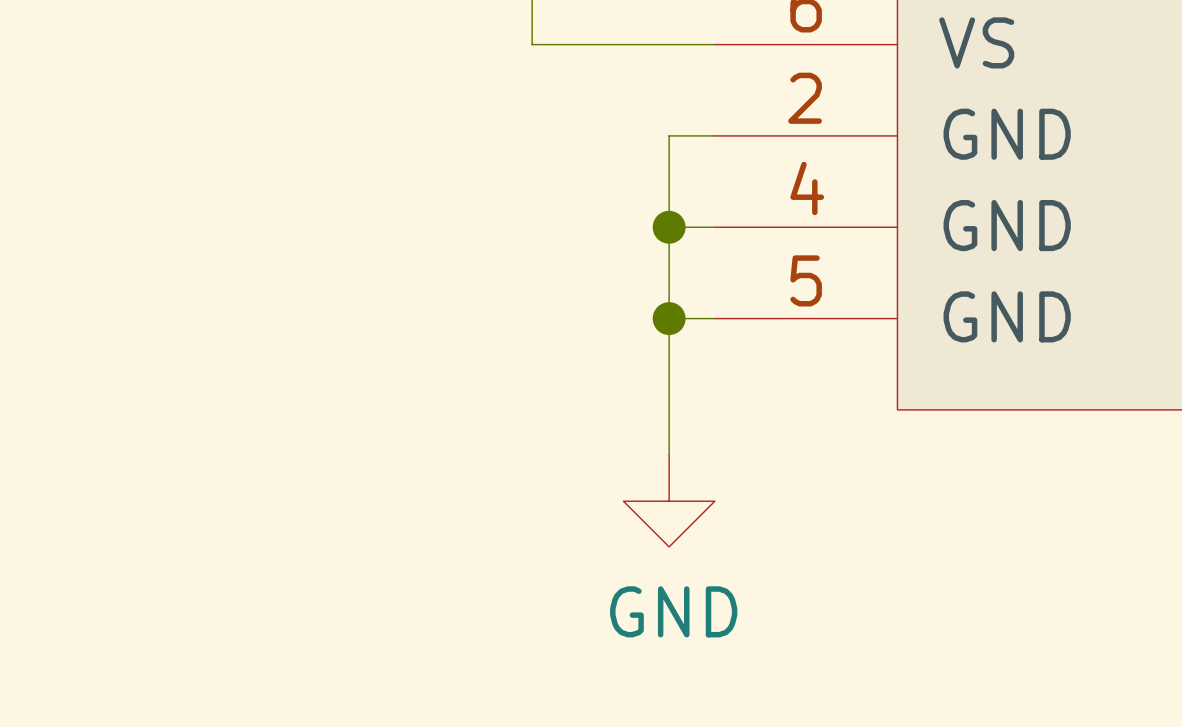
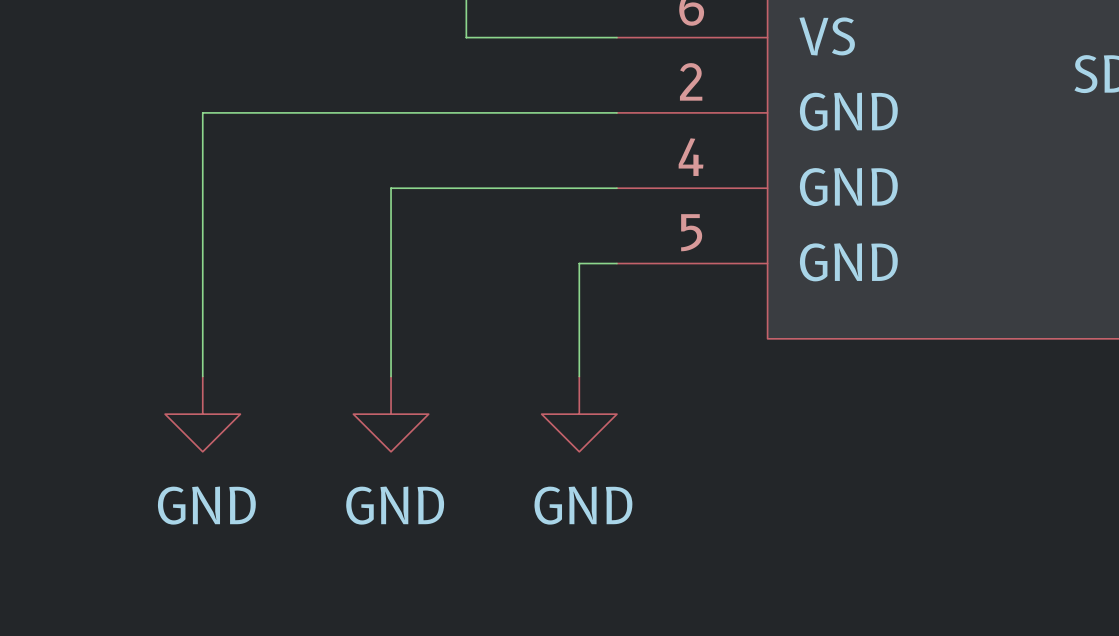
wire: (669, 135) (669, 318) -> (579, 112) (202, 112) (202, 376)
wire: none -> (579, 188) (391, 188) (391, 376)
junction: (669, 227) -> none
junction: (669, 318) -> none
power symbol: none -> GND (202, 414)
power symbol: none -> GND (391, 414)

